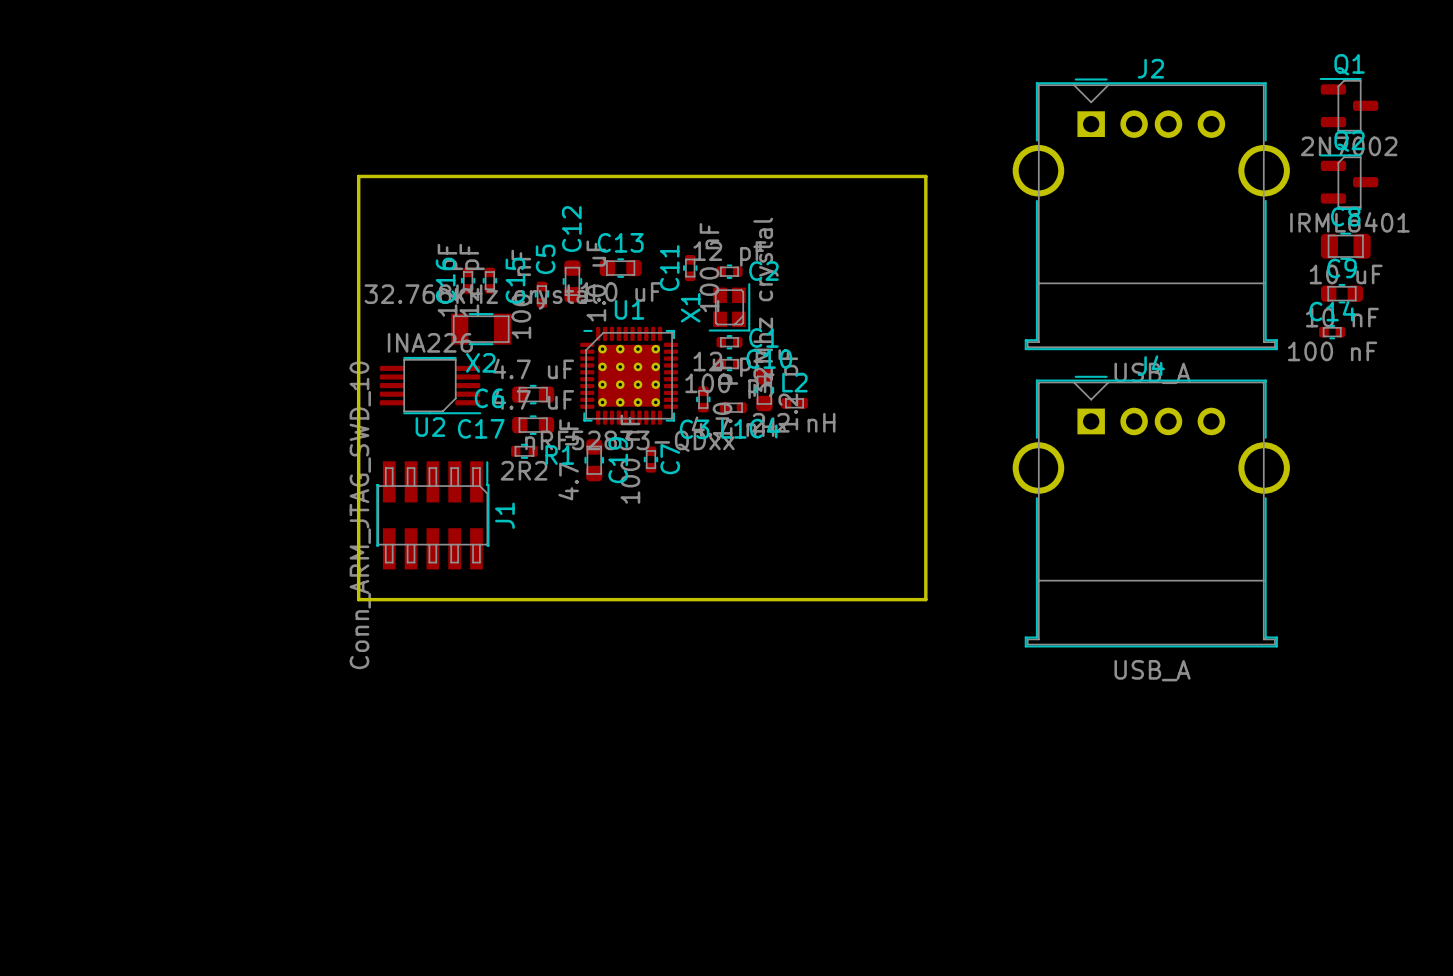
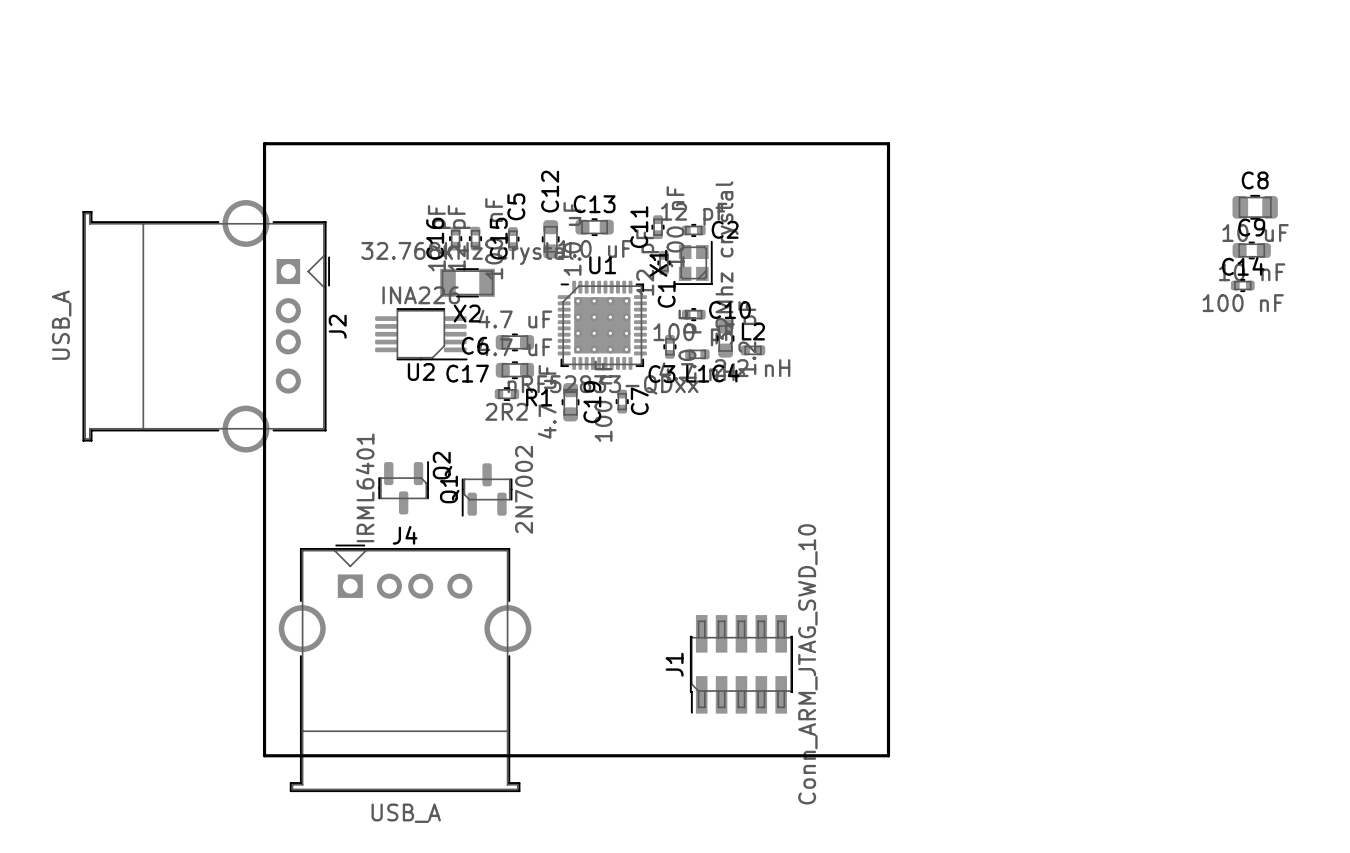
Q1 rotation: 0° (1349, 105) -> 90° counterclockwise (487, 489)
Q1 position: (1349, 105) -> (487, 489)
board edge: (358, 176) (358, 599) (925, 599) (925, 176) -> (355, 143) (264, 143) (264, 755) (888, 755) (888, 143) (872, 143)
Q2 rotation: 0° (1349, 182) -> 90° clockwise (403, 487)
Q2 position: (1349, 182) -> (403, 487)
J2 rotation: 0° (1151, 214) -> 90° clockwise (206, 326)
J2 position: (1151, 214) -> (206, 326)
C5 position: (541, 294) -> (512, 239)
C1 rotation: 0° (729, 342) -> 90° clockwise (663, 262)
C1 position: (729, 342) -> (663, 262)
J4 position: (1151, 511) -> (405, 668)
J1 rotation: 0° (432, 515) -> 180° (741, 664)
J1 position: (432, 515) -> (741, 664)

